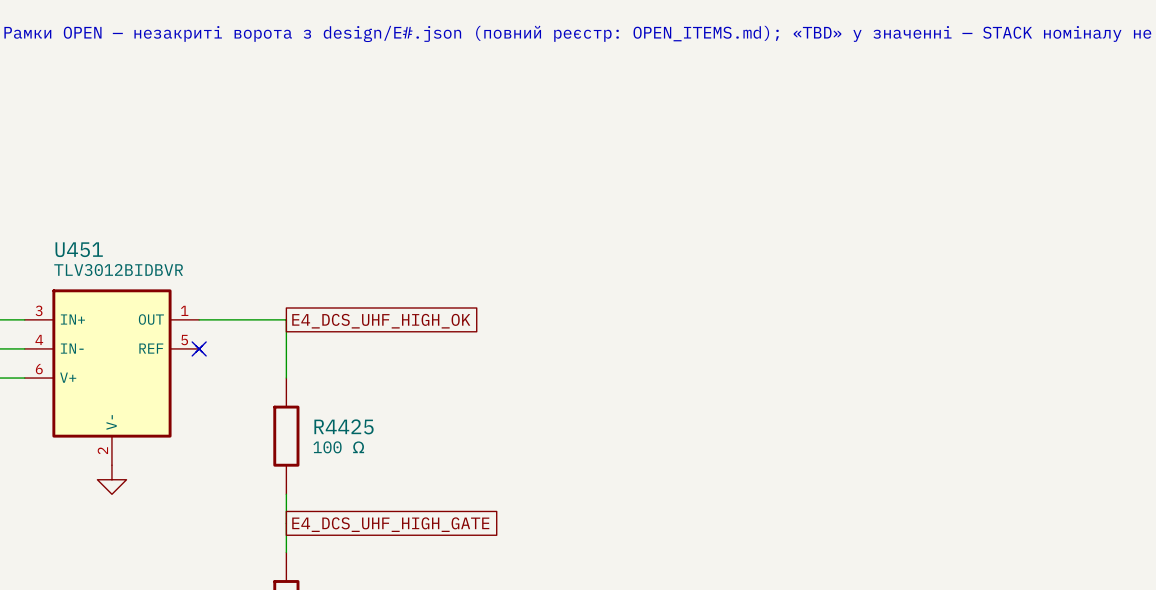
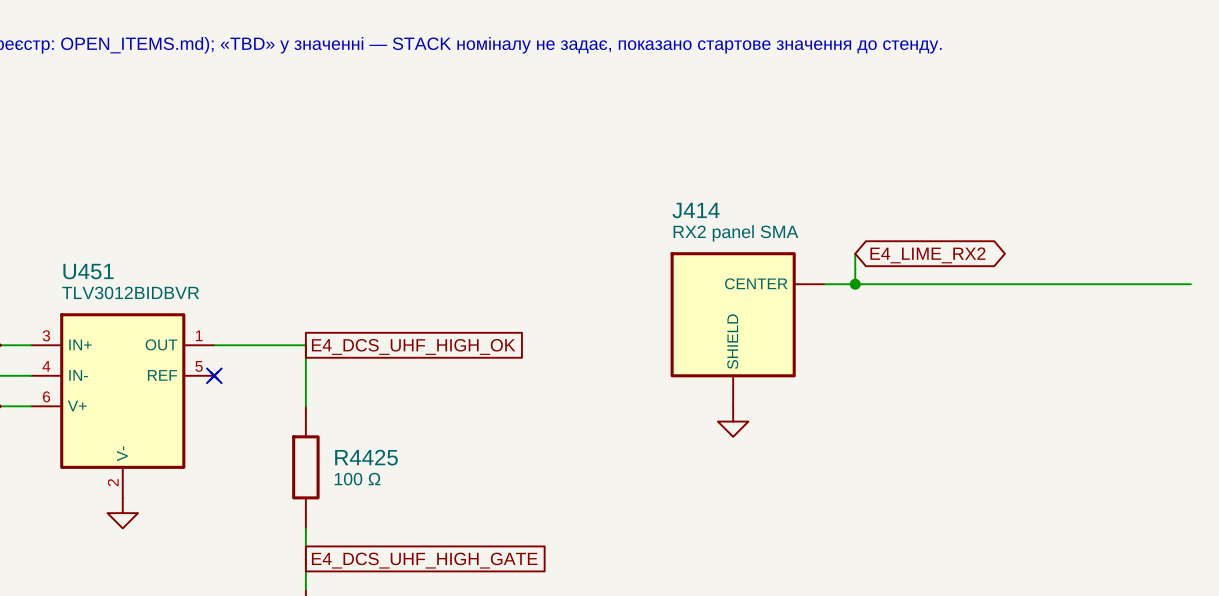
wire: none -> (855, 253) (855, 284)
global label: none -> E4_LIME_RX2 (927, 255)
wire: none -> (824, 284) (1190, 284)
junction: none -> (855, 284)
J414: none -> RX2 panel SMA (747, 329)
power symbol: none -> (733, 421)

